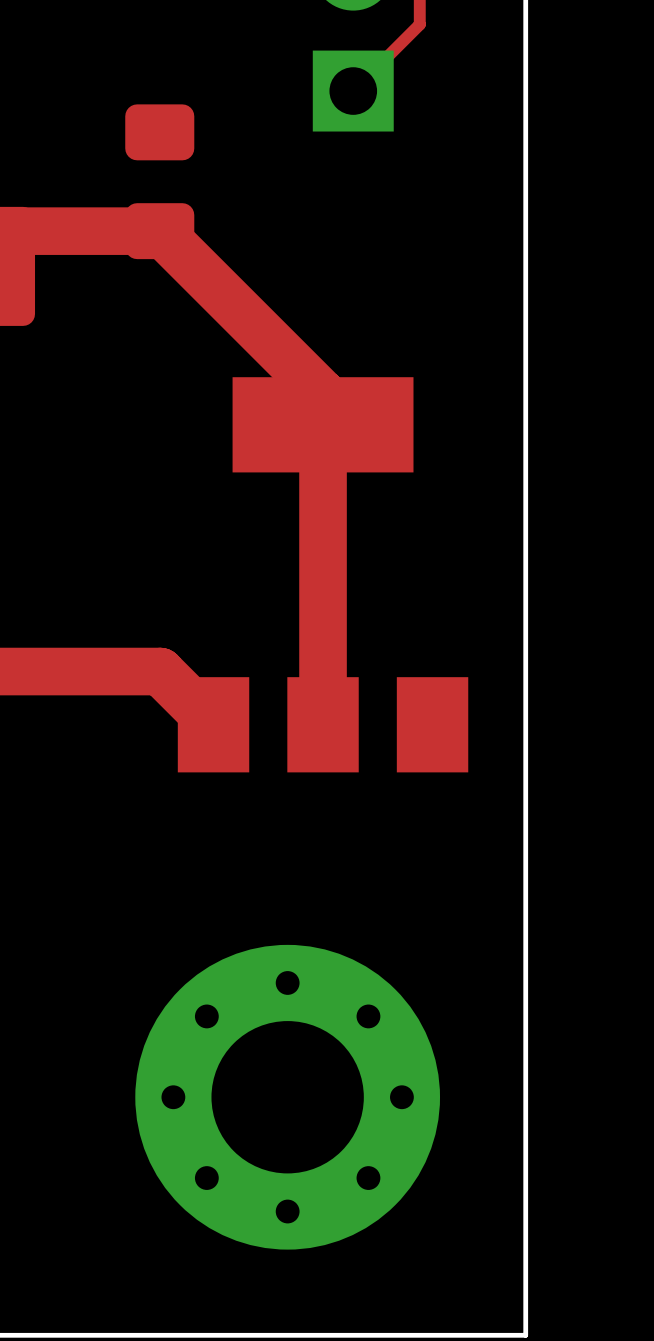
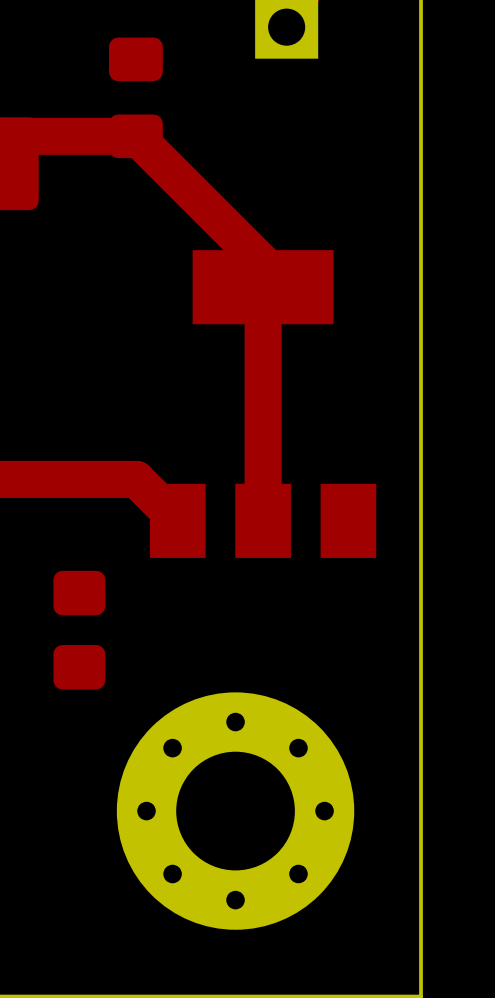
part: none -> (79, 630)

